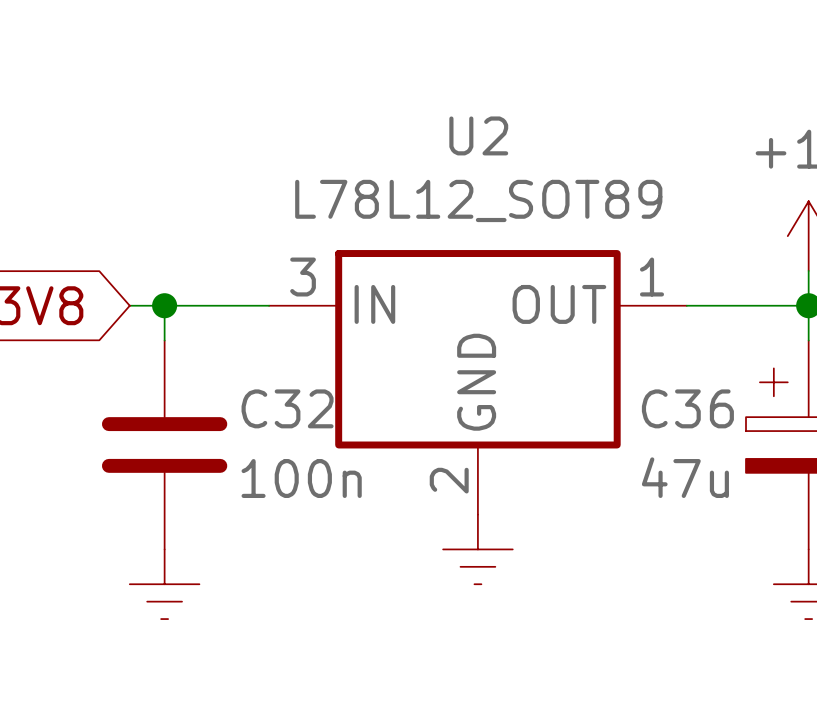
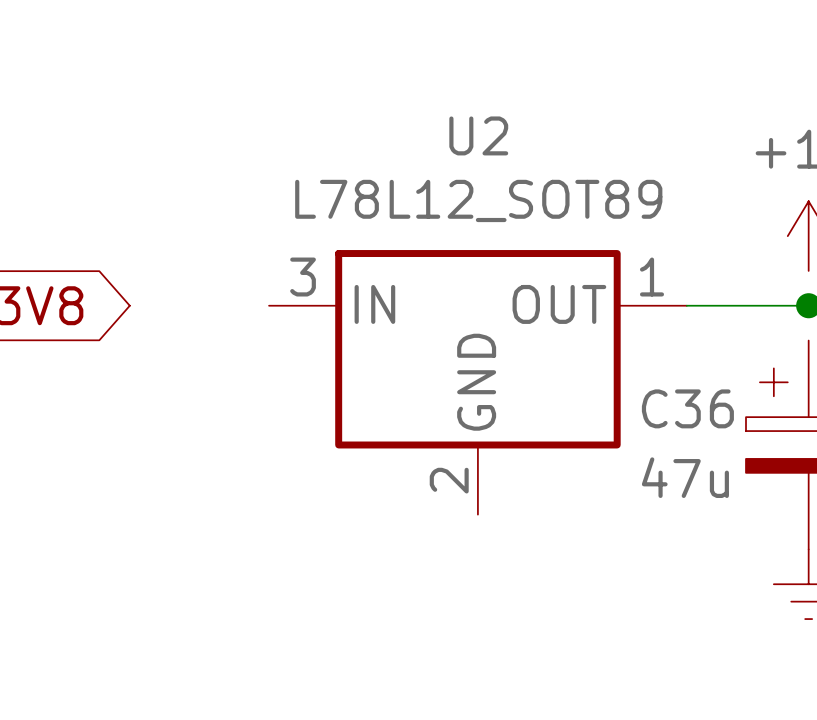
wire: (808, 270) (808, 340) -> none
wire: (129, 305) (269, 305) -> none
wire: (164, 305) (164, 340) -> none
junction: (164, 305) -> none
C32: 100n (164, 444) -> none
power symbol: (477, 549) -> none
power symbol: (164, 584) -> none

